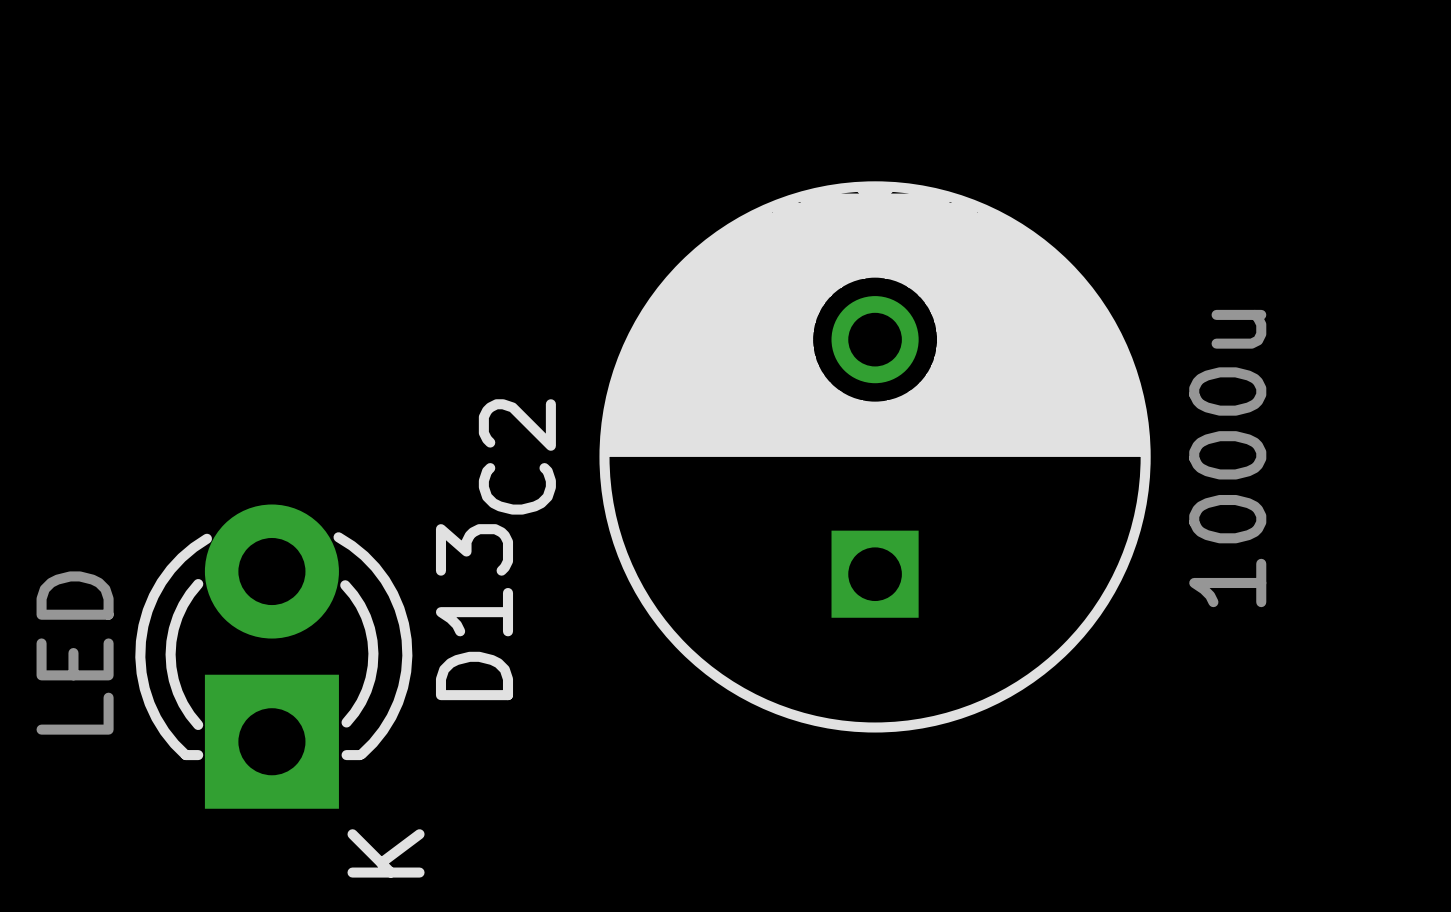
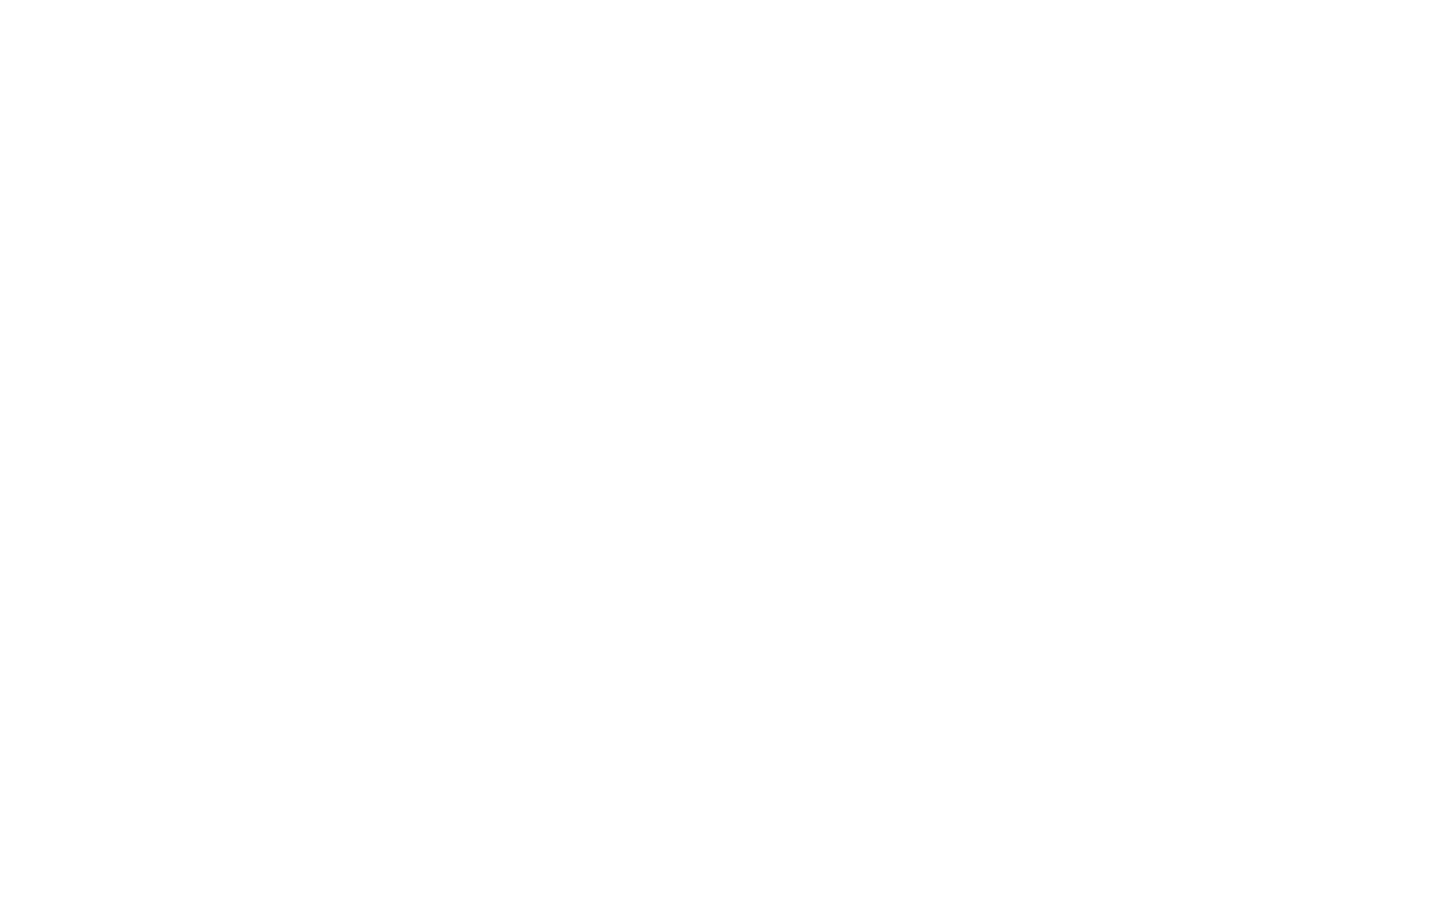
C2: 1000u (875, 456) -> none
D13: LED (273, 656) -> none

